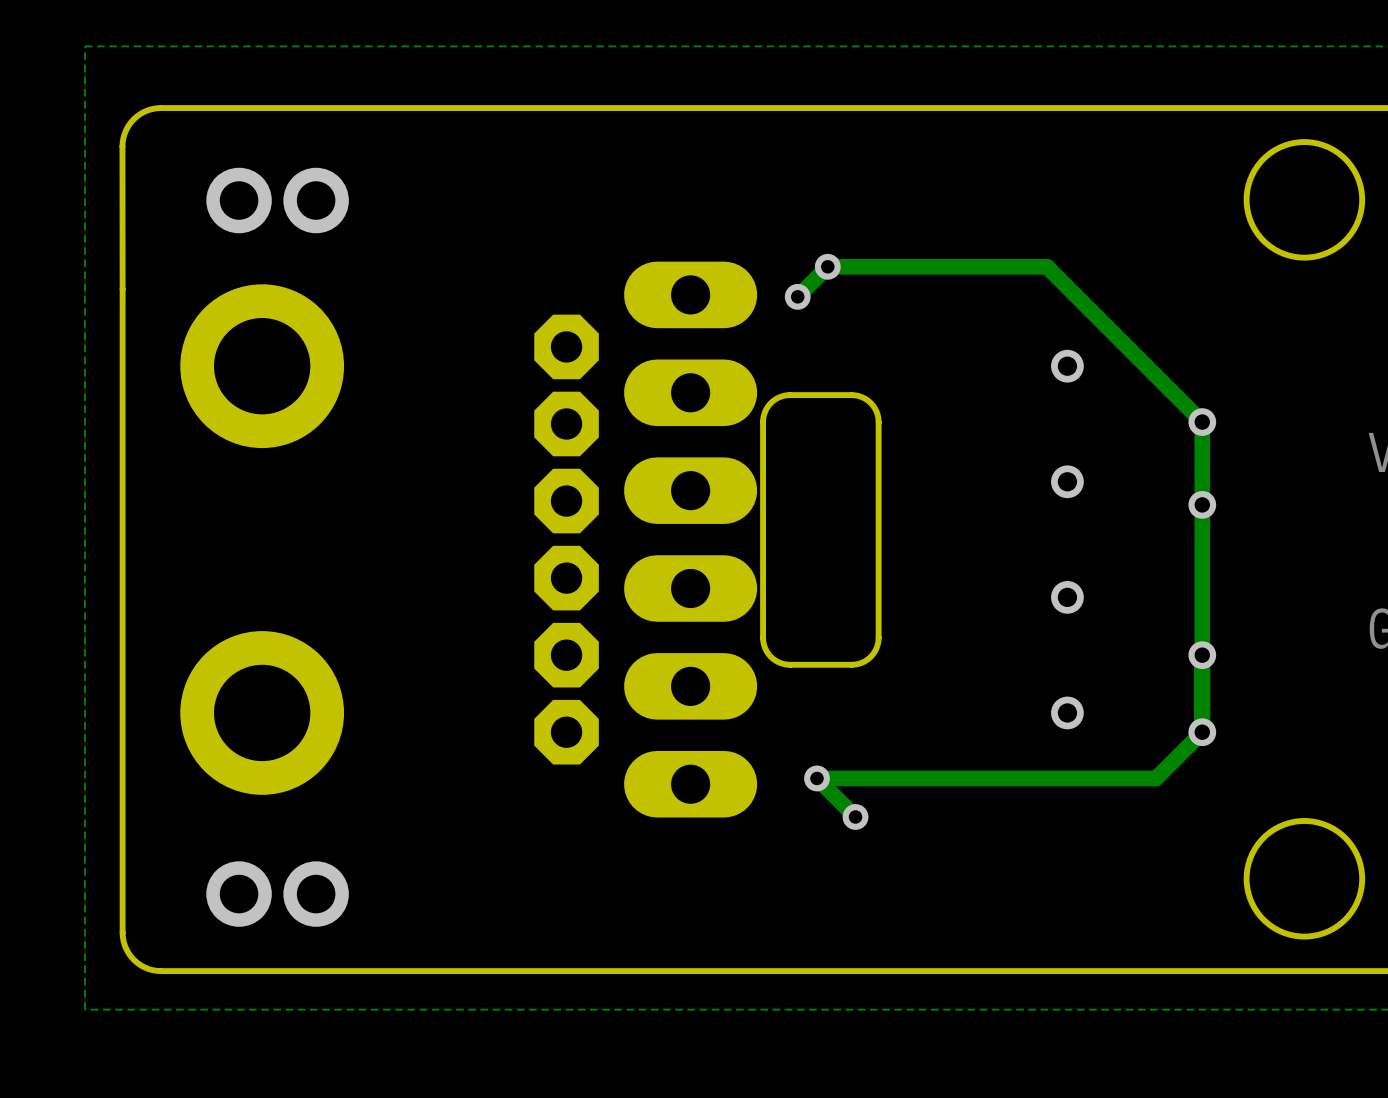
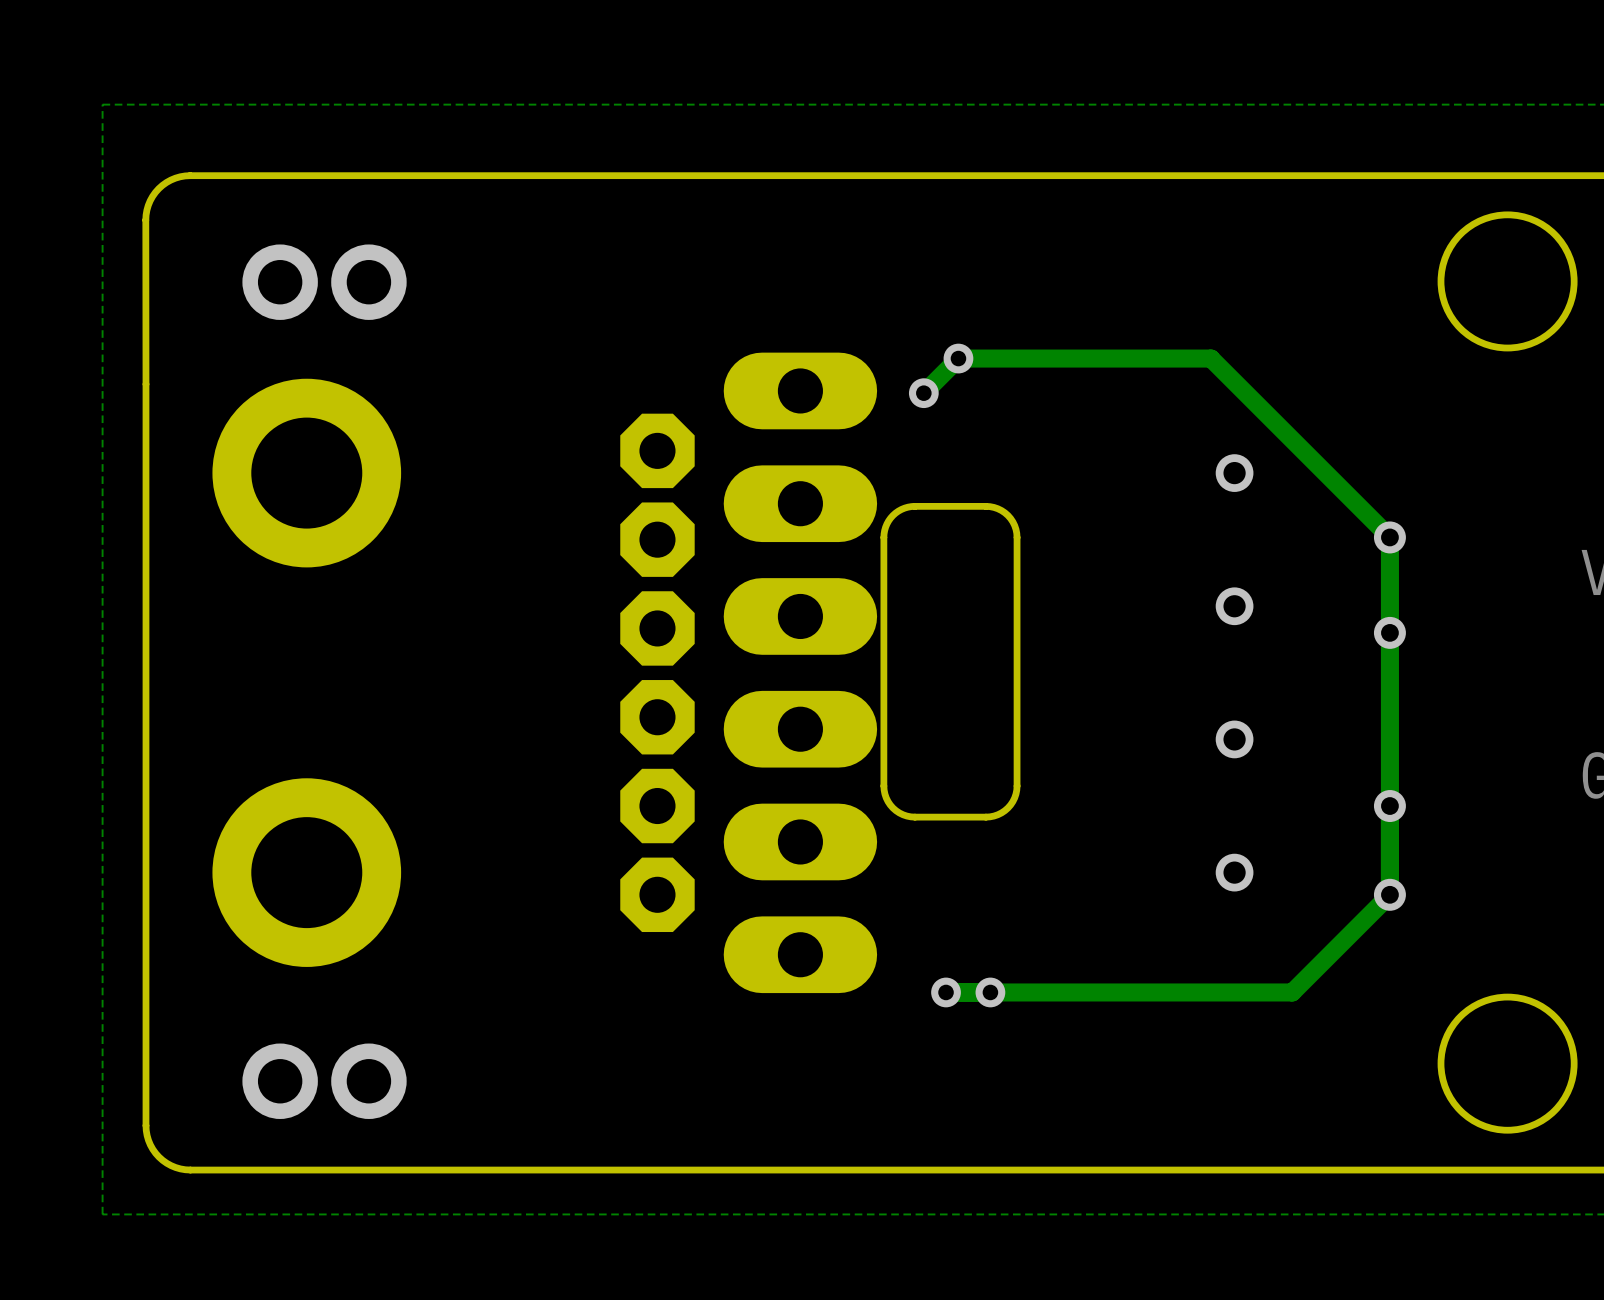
via position: (817, 778) -> (946, 992)
track: (1156, 778) (817, 778) (855, 816) -> (1336, 948) (1292, 992) (946, 992)

